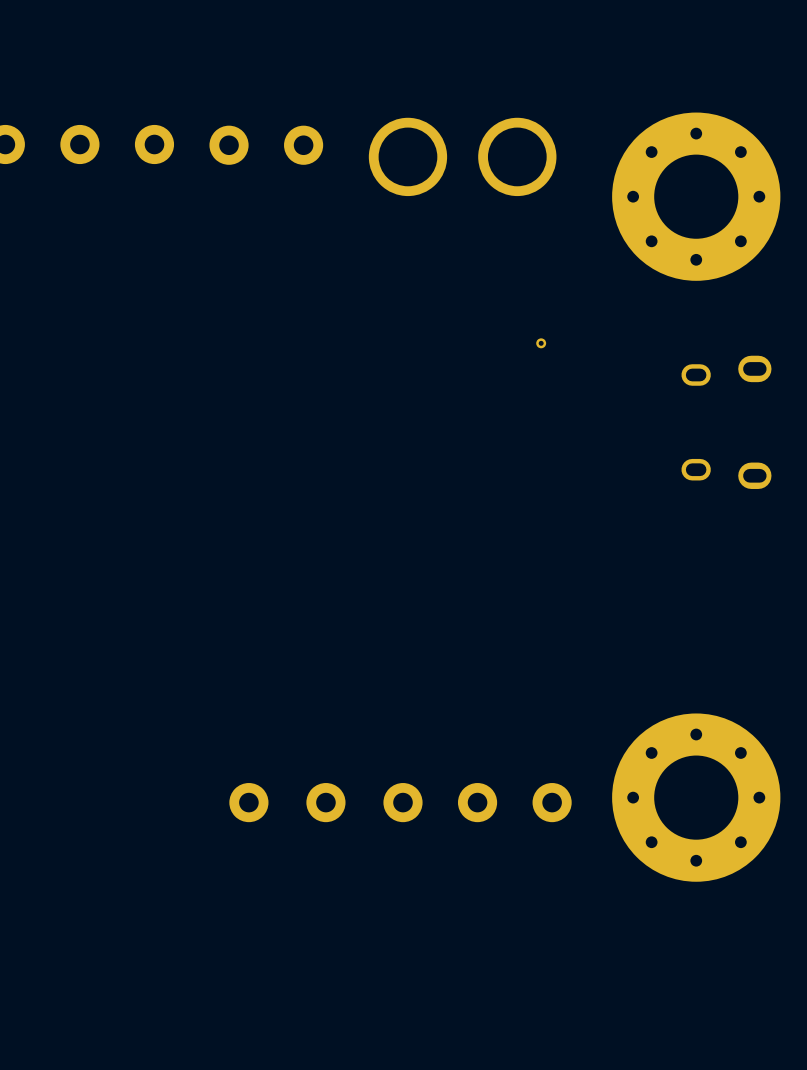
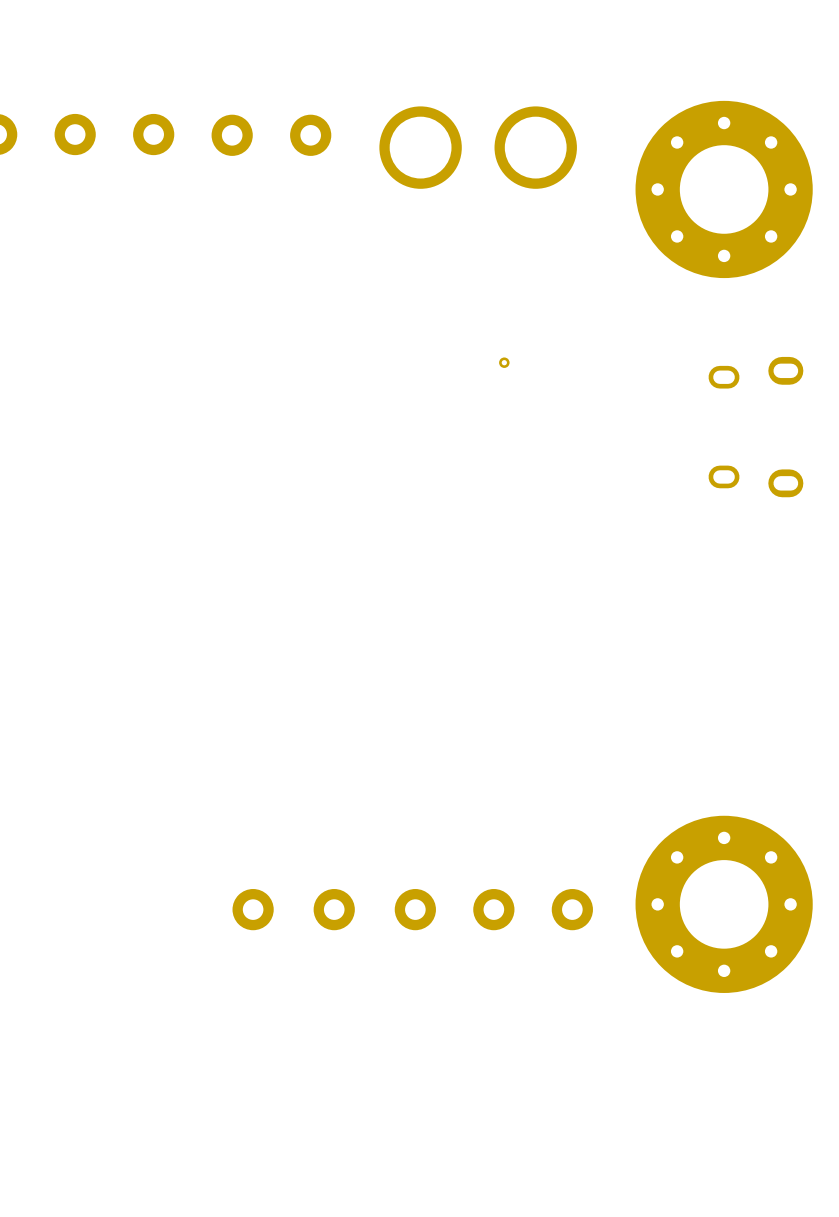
part position: (541, 343) -> (504, 362)
part position: (696, 797) -> (724, 904)
part: (248, 802) -> none
part: (325, 802) -> none
part: (402, 802) -> none
part: (477, 802) -> none
part: (552, 802) -> none
part: none -> (253, 909)
part: none -> (334, 909)
part: none -> (415, 909)
part: none -> (493, 909)
part: none -> (572, 909)

